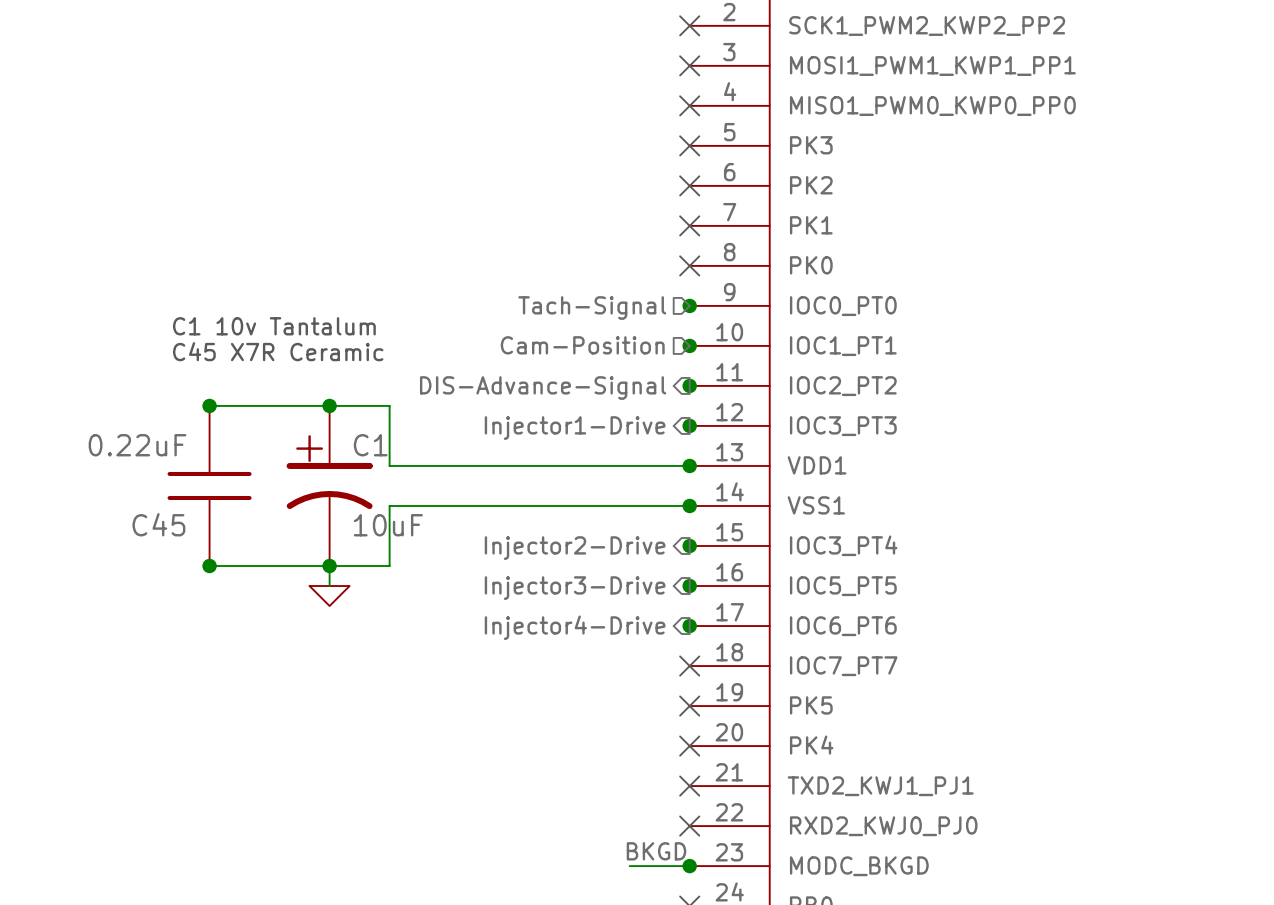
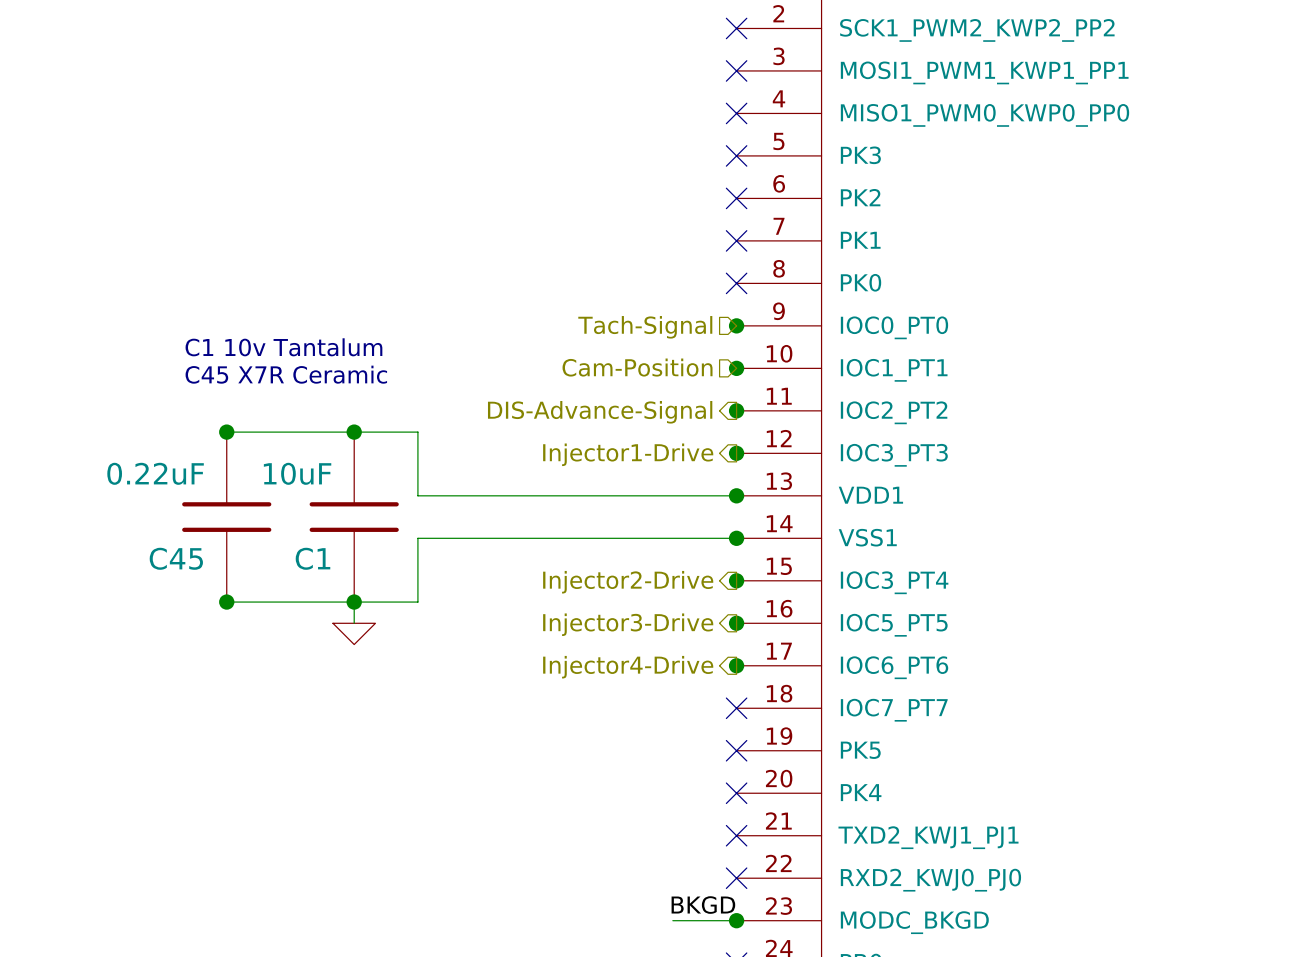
C1 symbol: [286, 405, 373, 567] -> [309, 432, 399, 603]
C1 name position: C1 (370, 445) -> C1 (312, 558)
C1 value position: 10uF (388, 525) -> 10uF (297, 473)

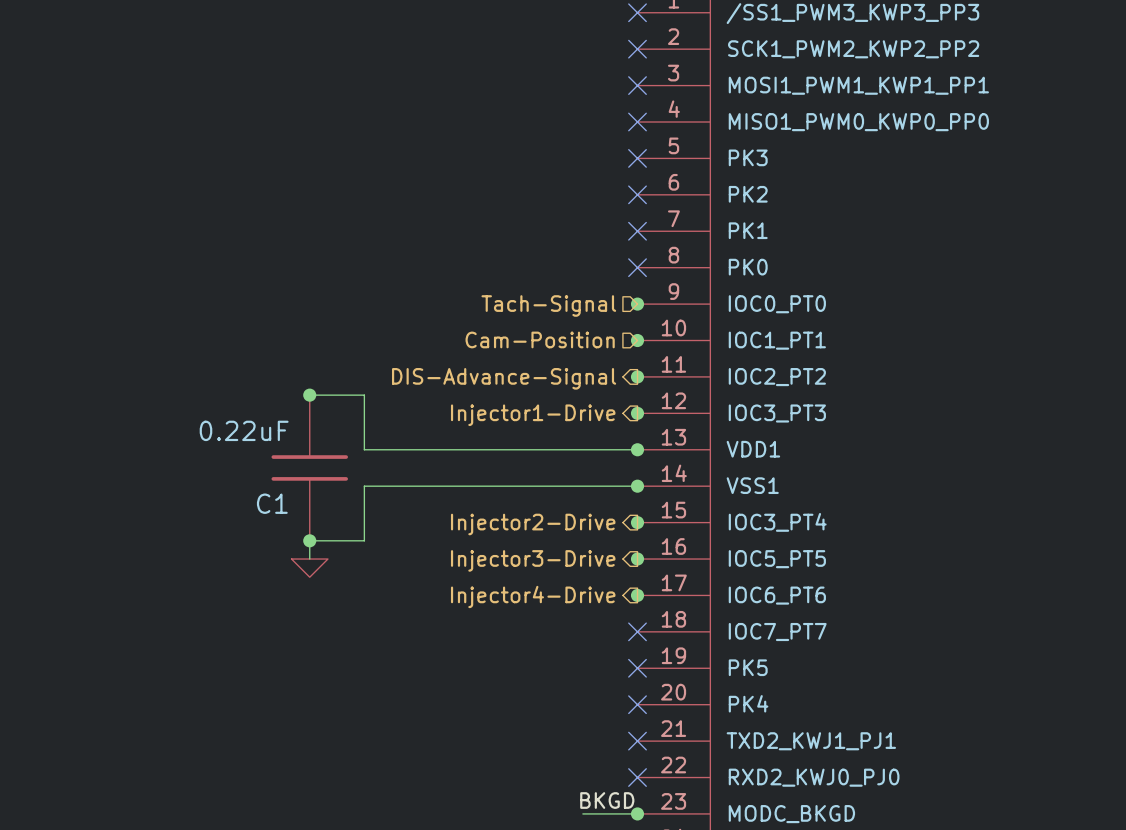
text: C1 10v Tantalum (283, 347) -> none
text: C45 X7R Ceramic (286, 374) -> none
wire: (226, 432) (354, 432) -> none
junction: (226, 432) -> none
C1 value: 10uF (297, 473) -> 0.22uF (244, 430)
C45: 0.22uF (226, 517) -> none
wire: (226, 602) (354, 602) -> none
junction: (226, 602) -> none

